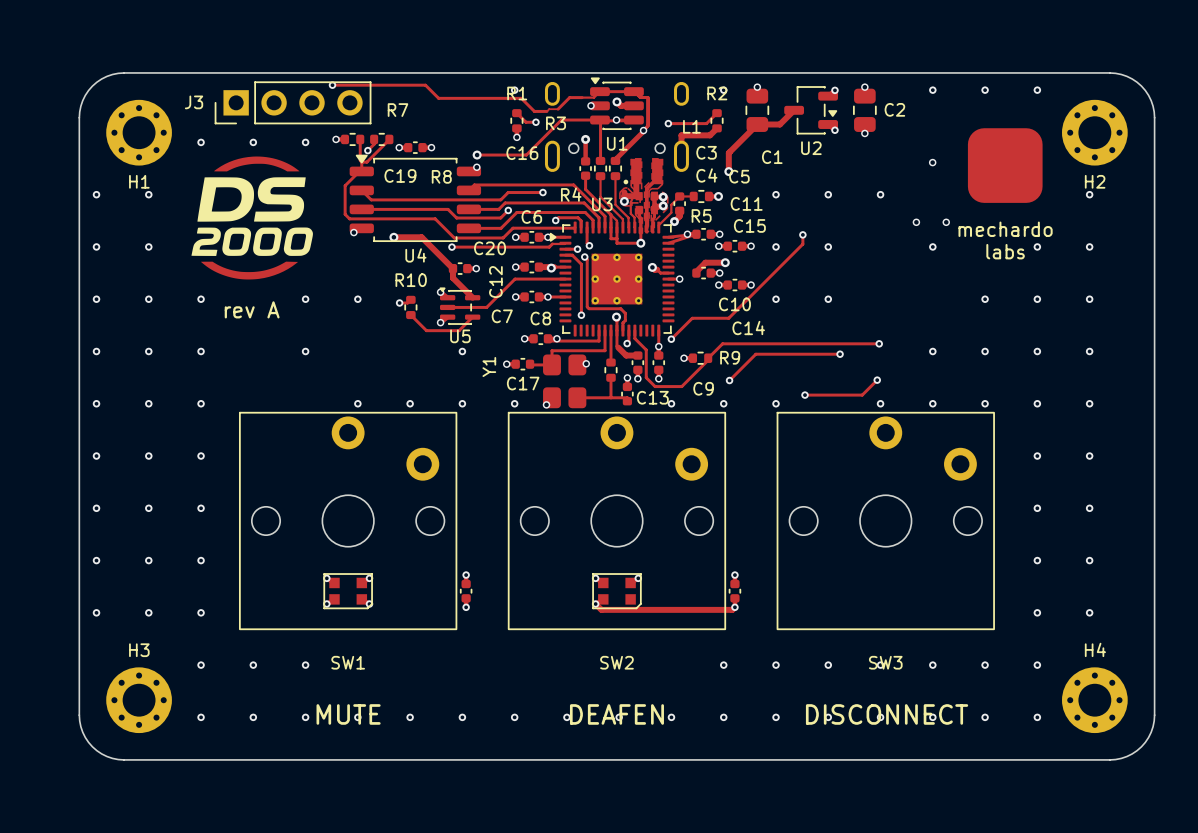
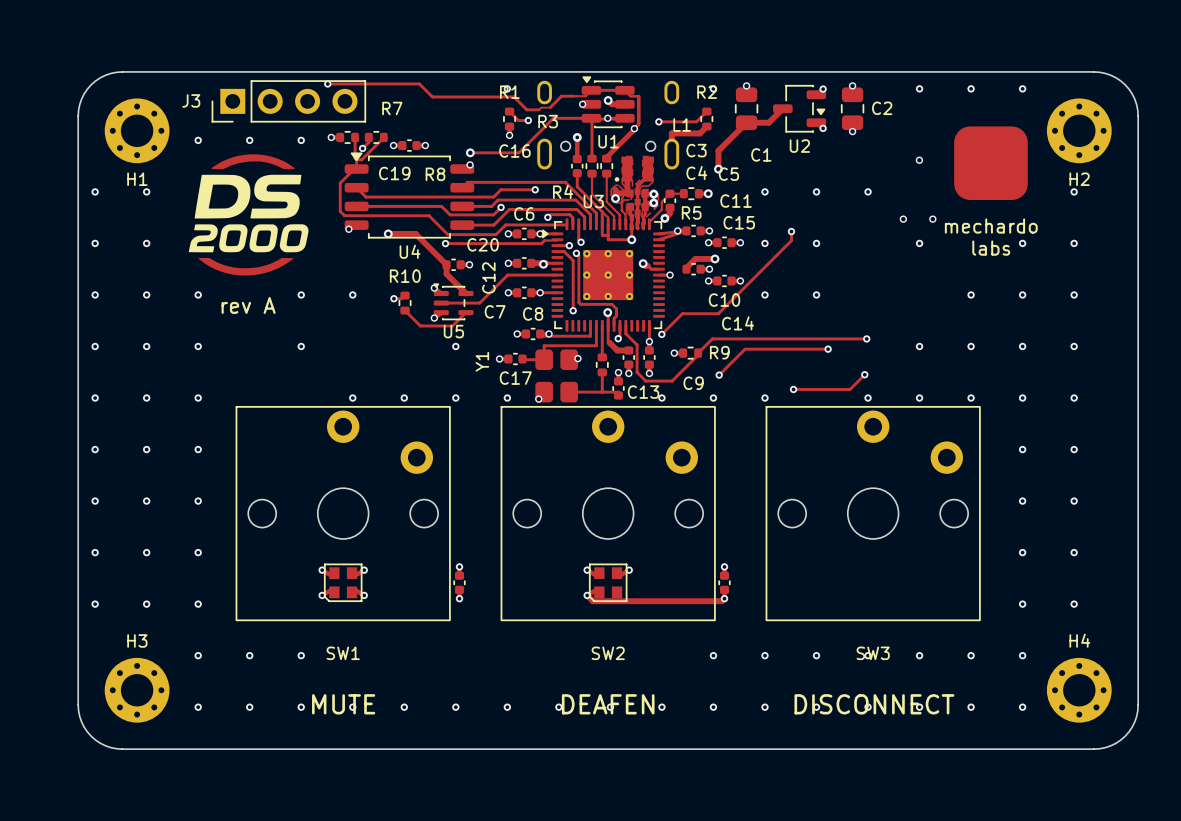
part footprint: [323, 573, 373, 610] -> [323, 563, 363, 603]
part footprint: [592, 573, 642, 610] -> [588, 563, 628, 603]

